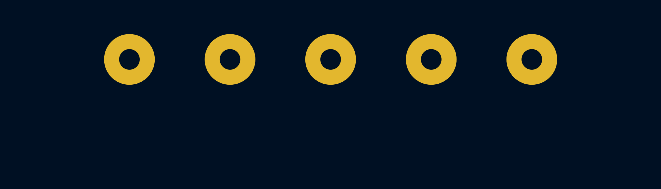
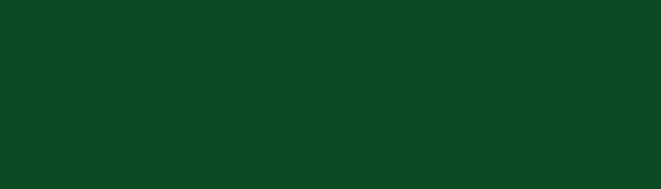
part: (129, 59) -> none
part: (230, 59) -> none
part: (330, 59) -> none
part: (431, 59) -> none
part: (531, 59) -> none

